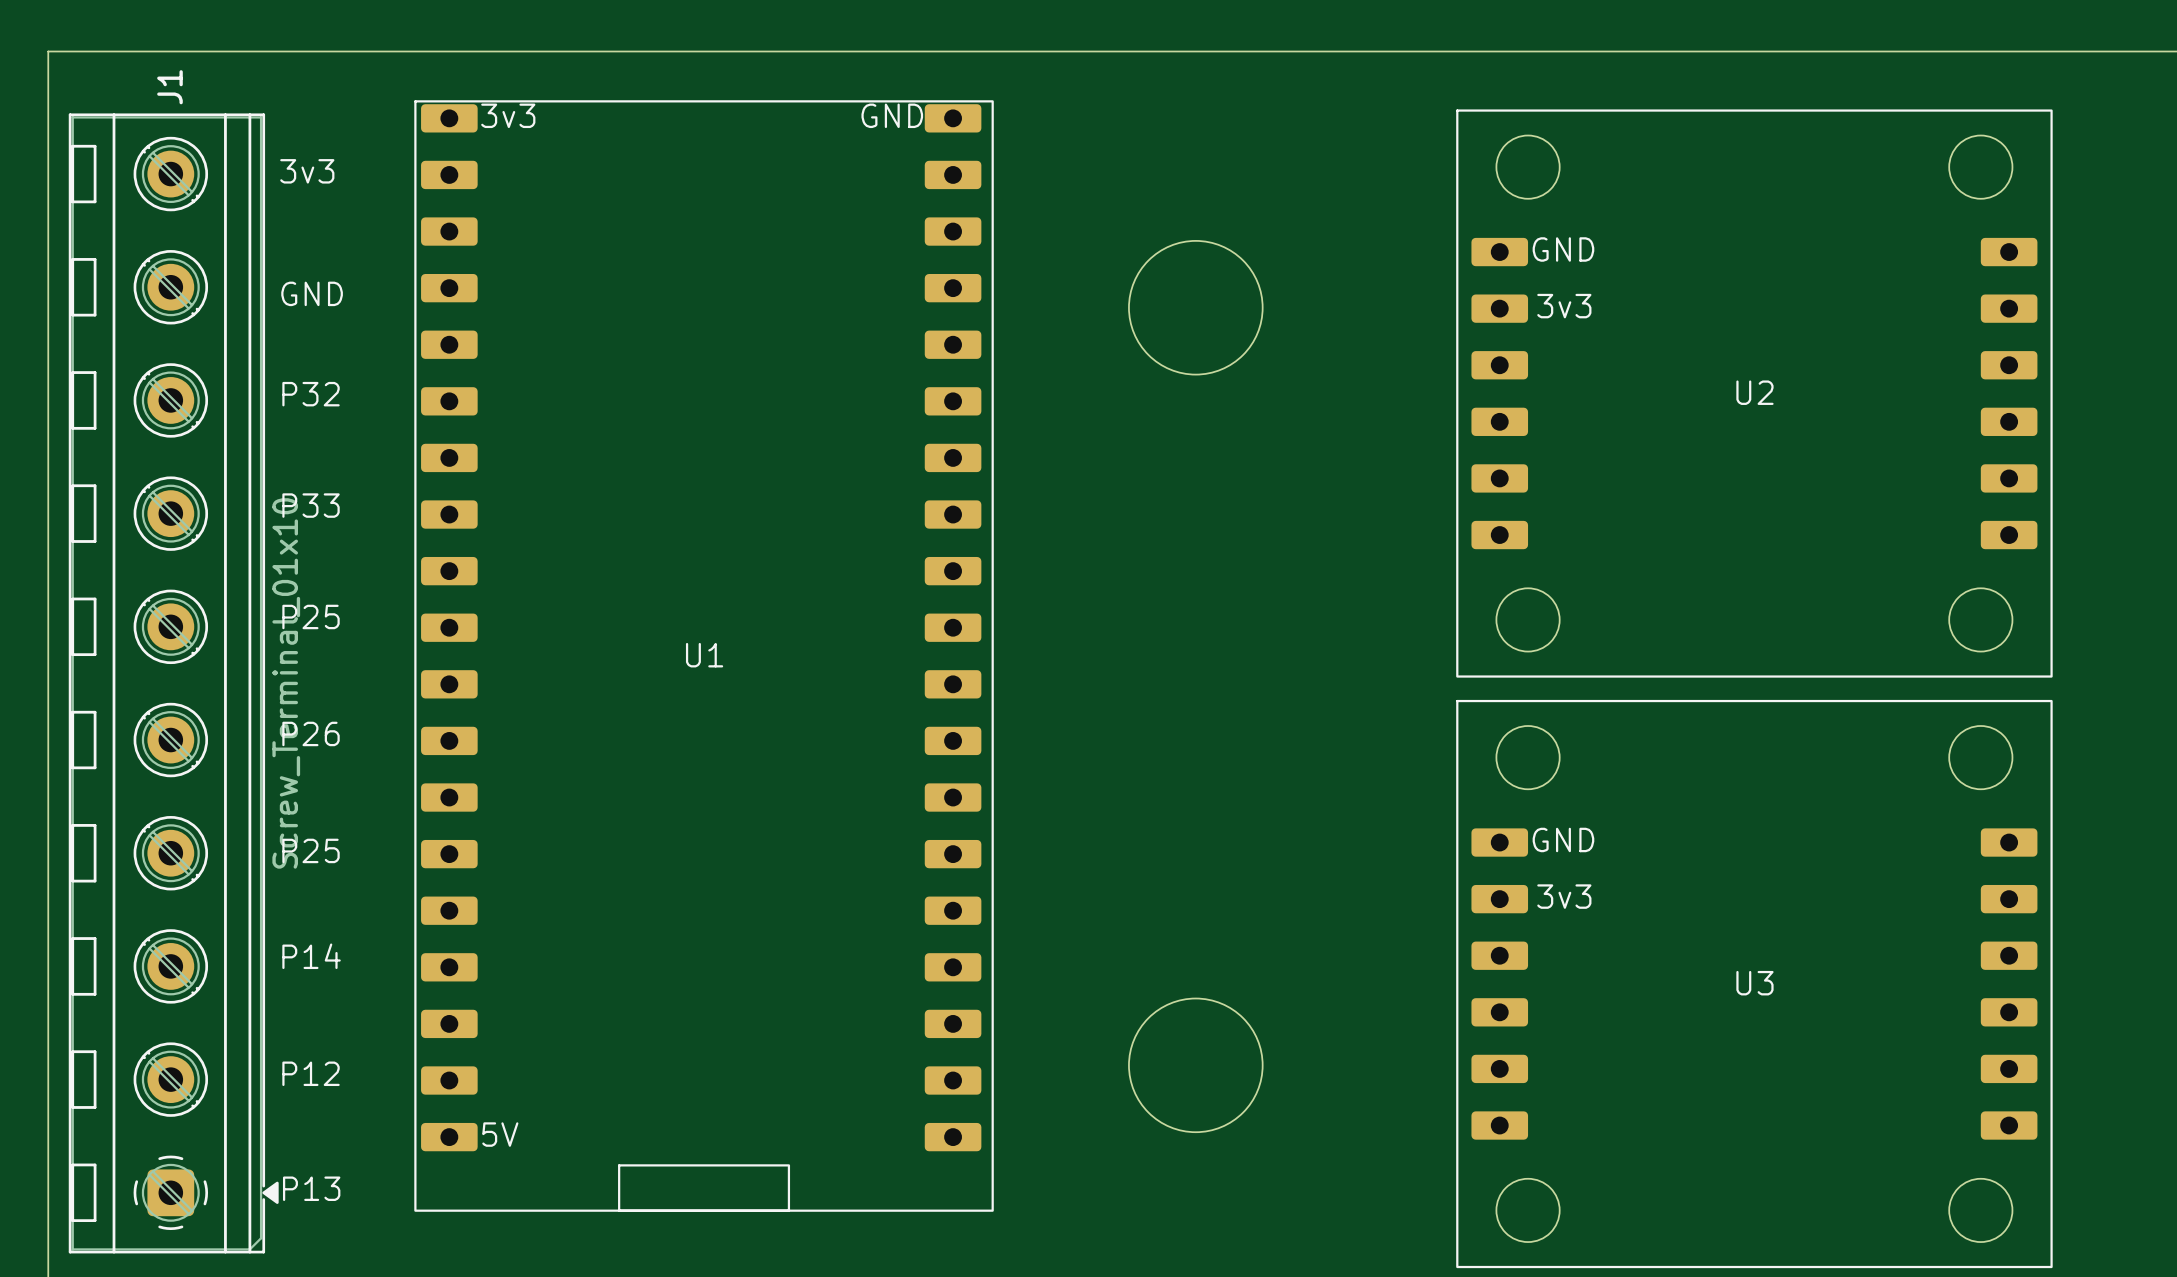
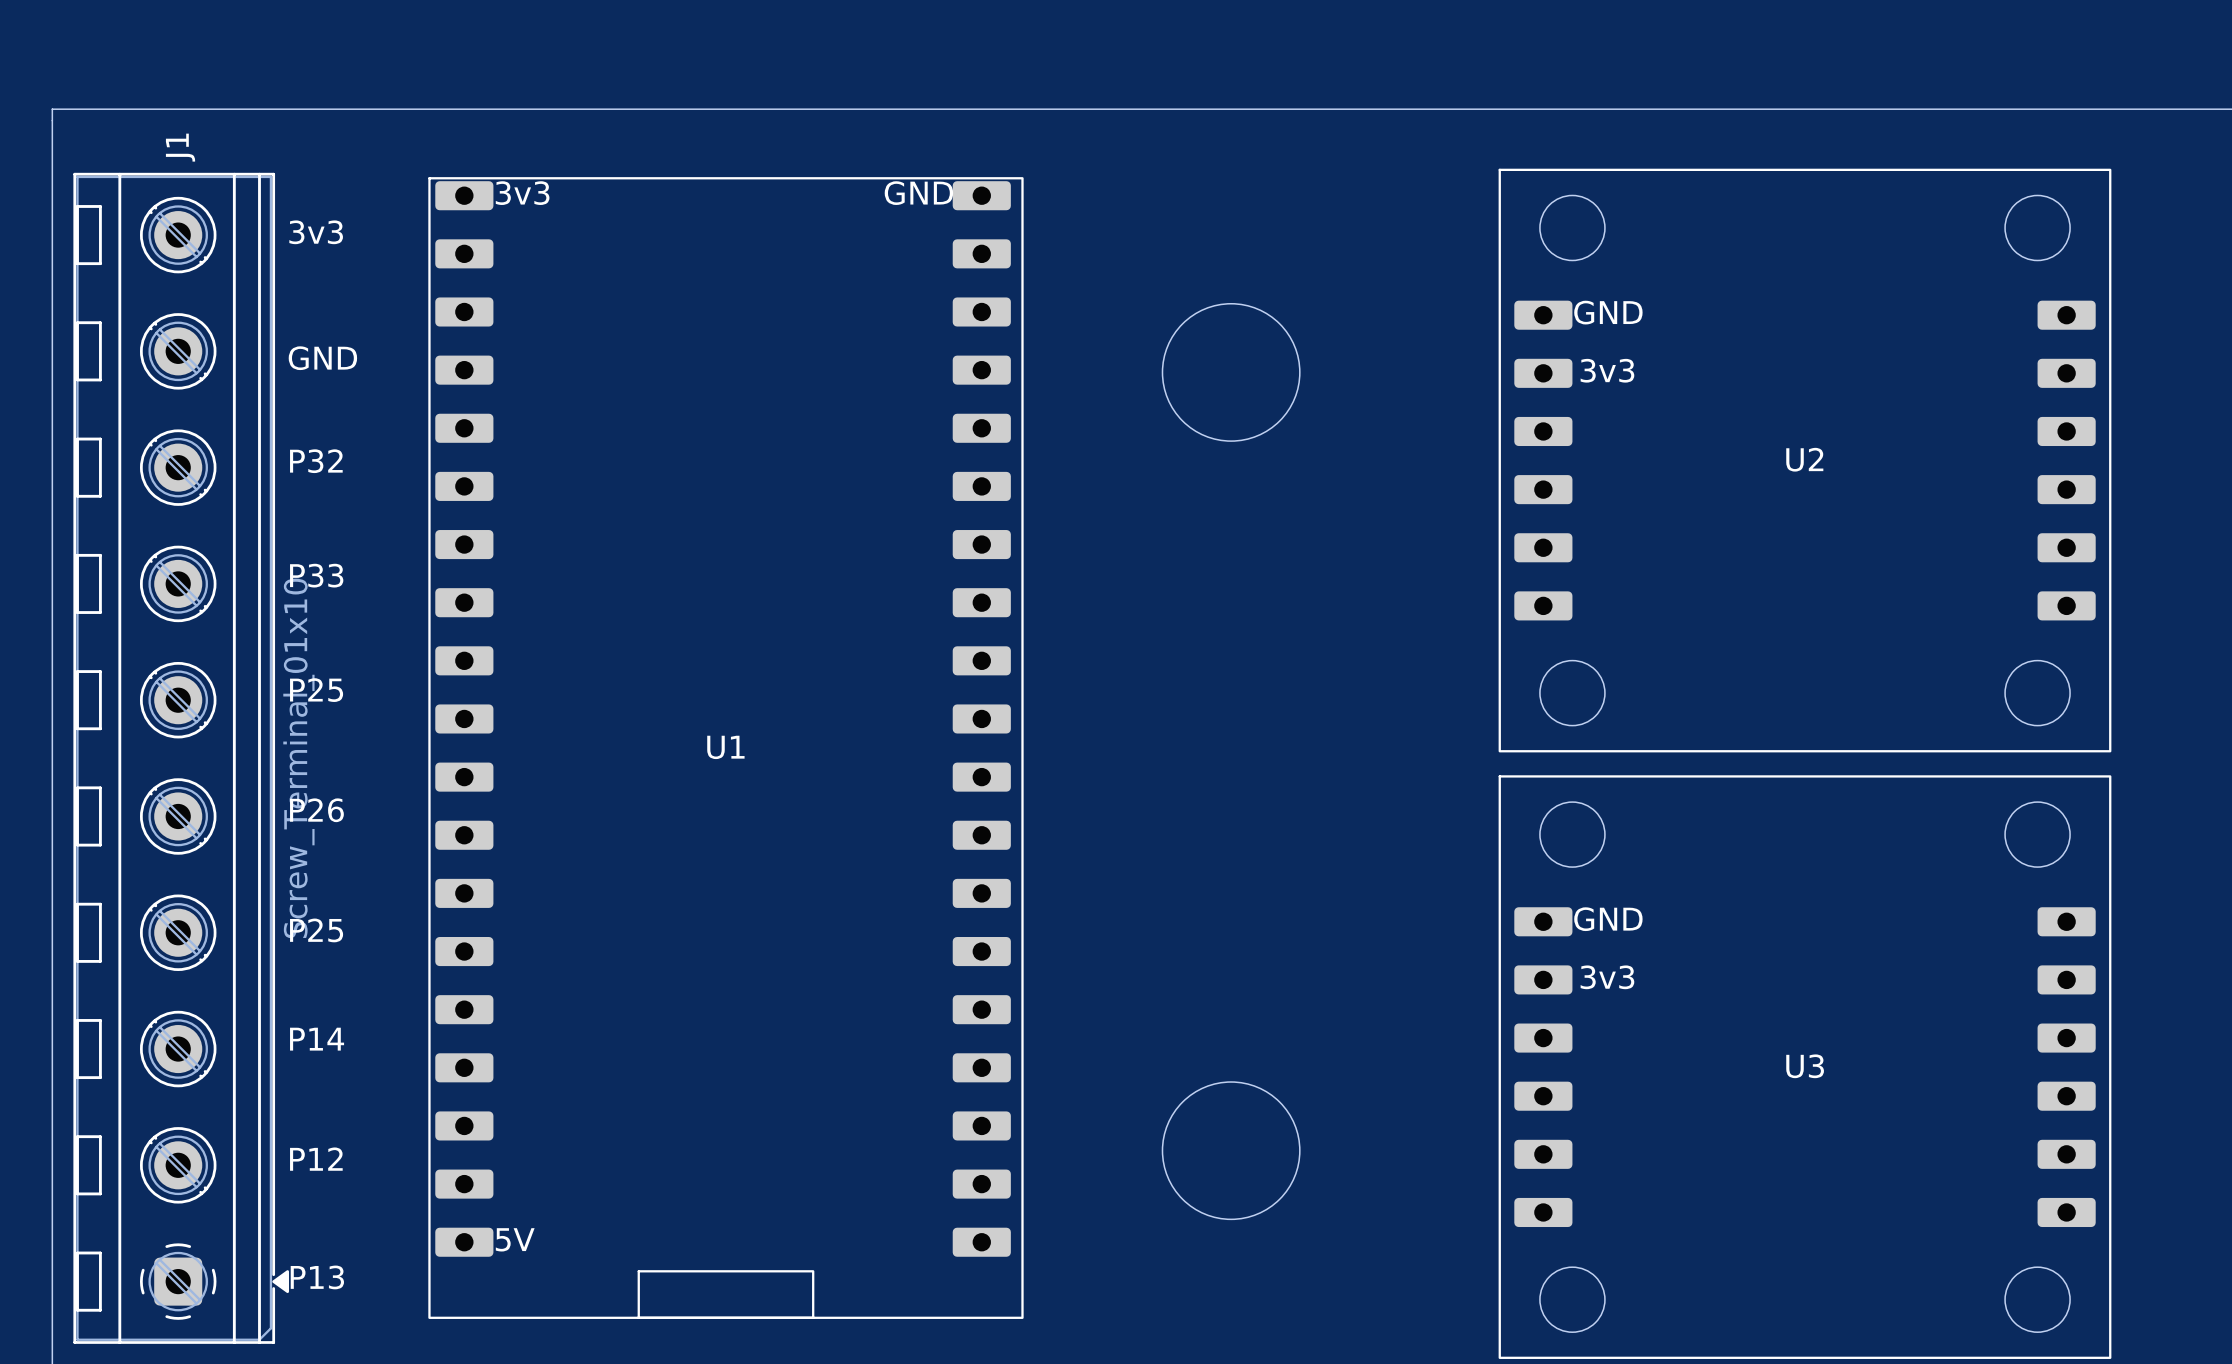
U1 position: (704, 656) -> (725, 748)

